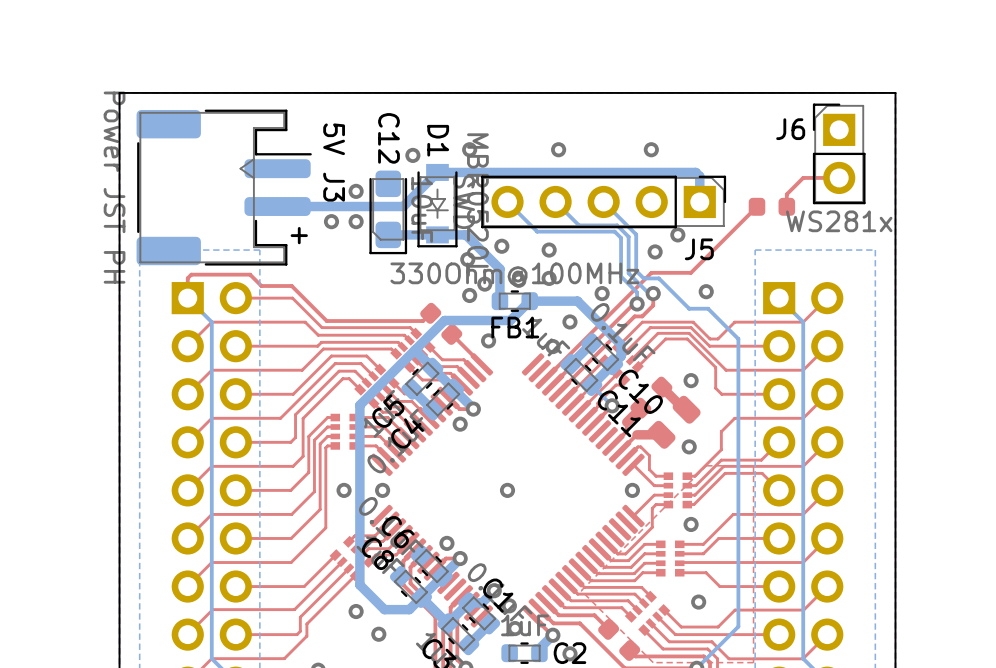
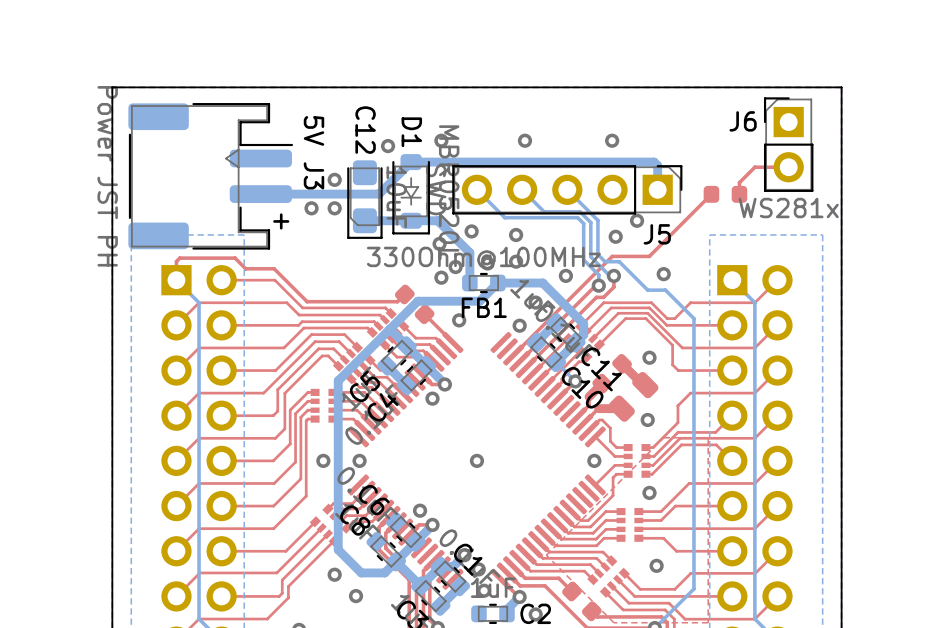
D1 footprint: [417, 163, 458, 248] -> [392, 154, 431, 235]
C10 footprint: [581, 333, 624, 376] -> [526, 332, 567, 373]
C11 footprint: [560, 353, 603, 396] -> [546, 313, 586, 353]

